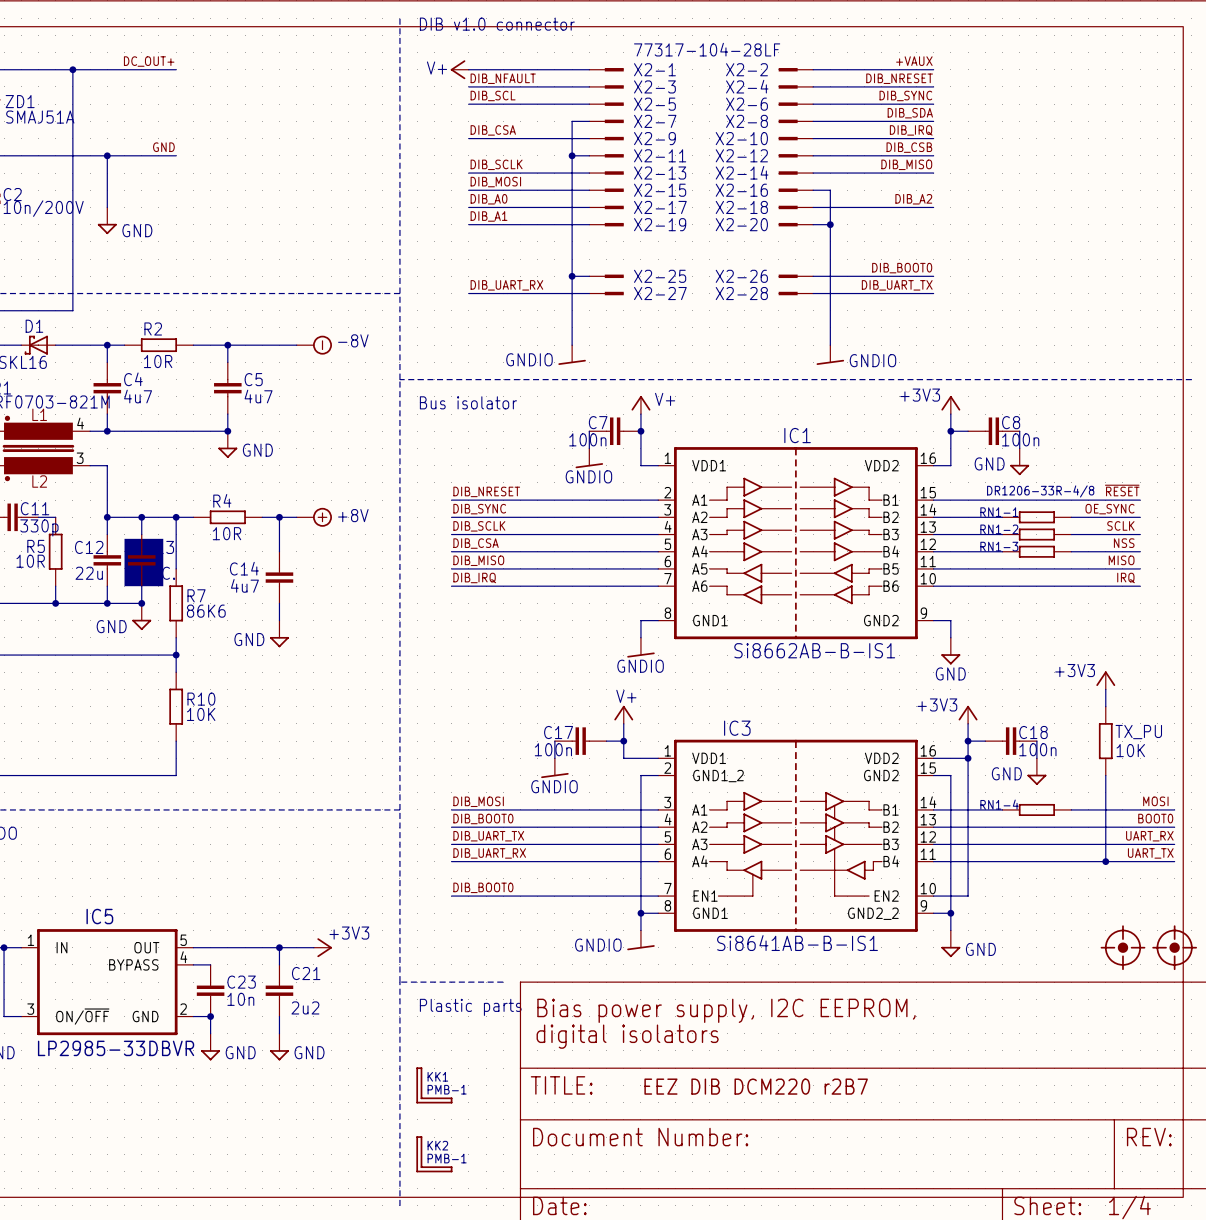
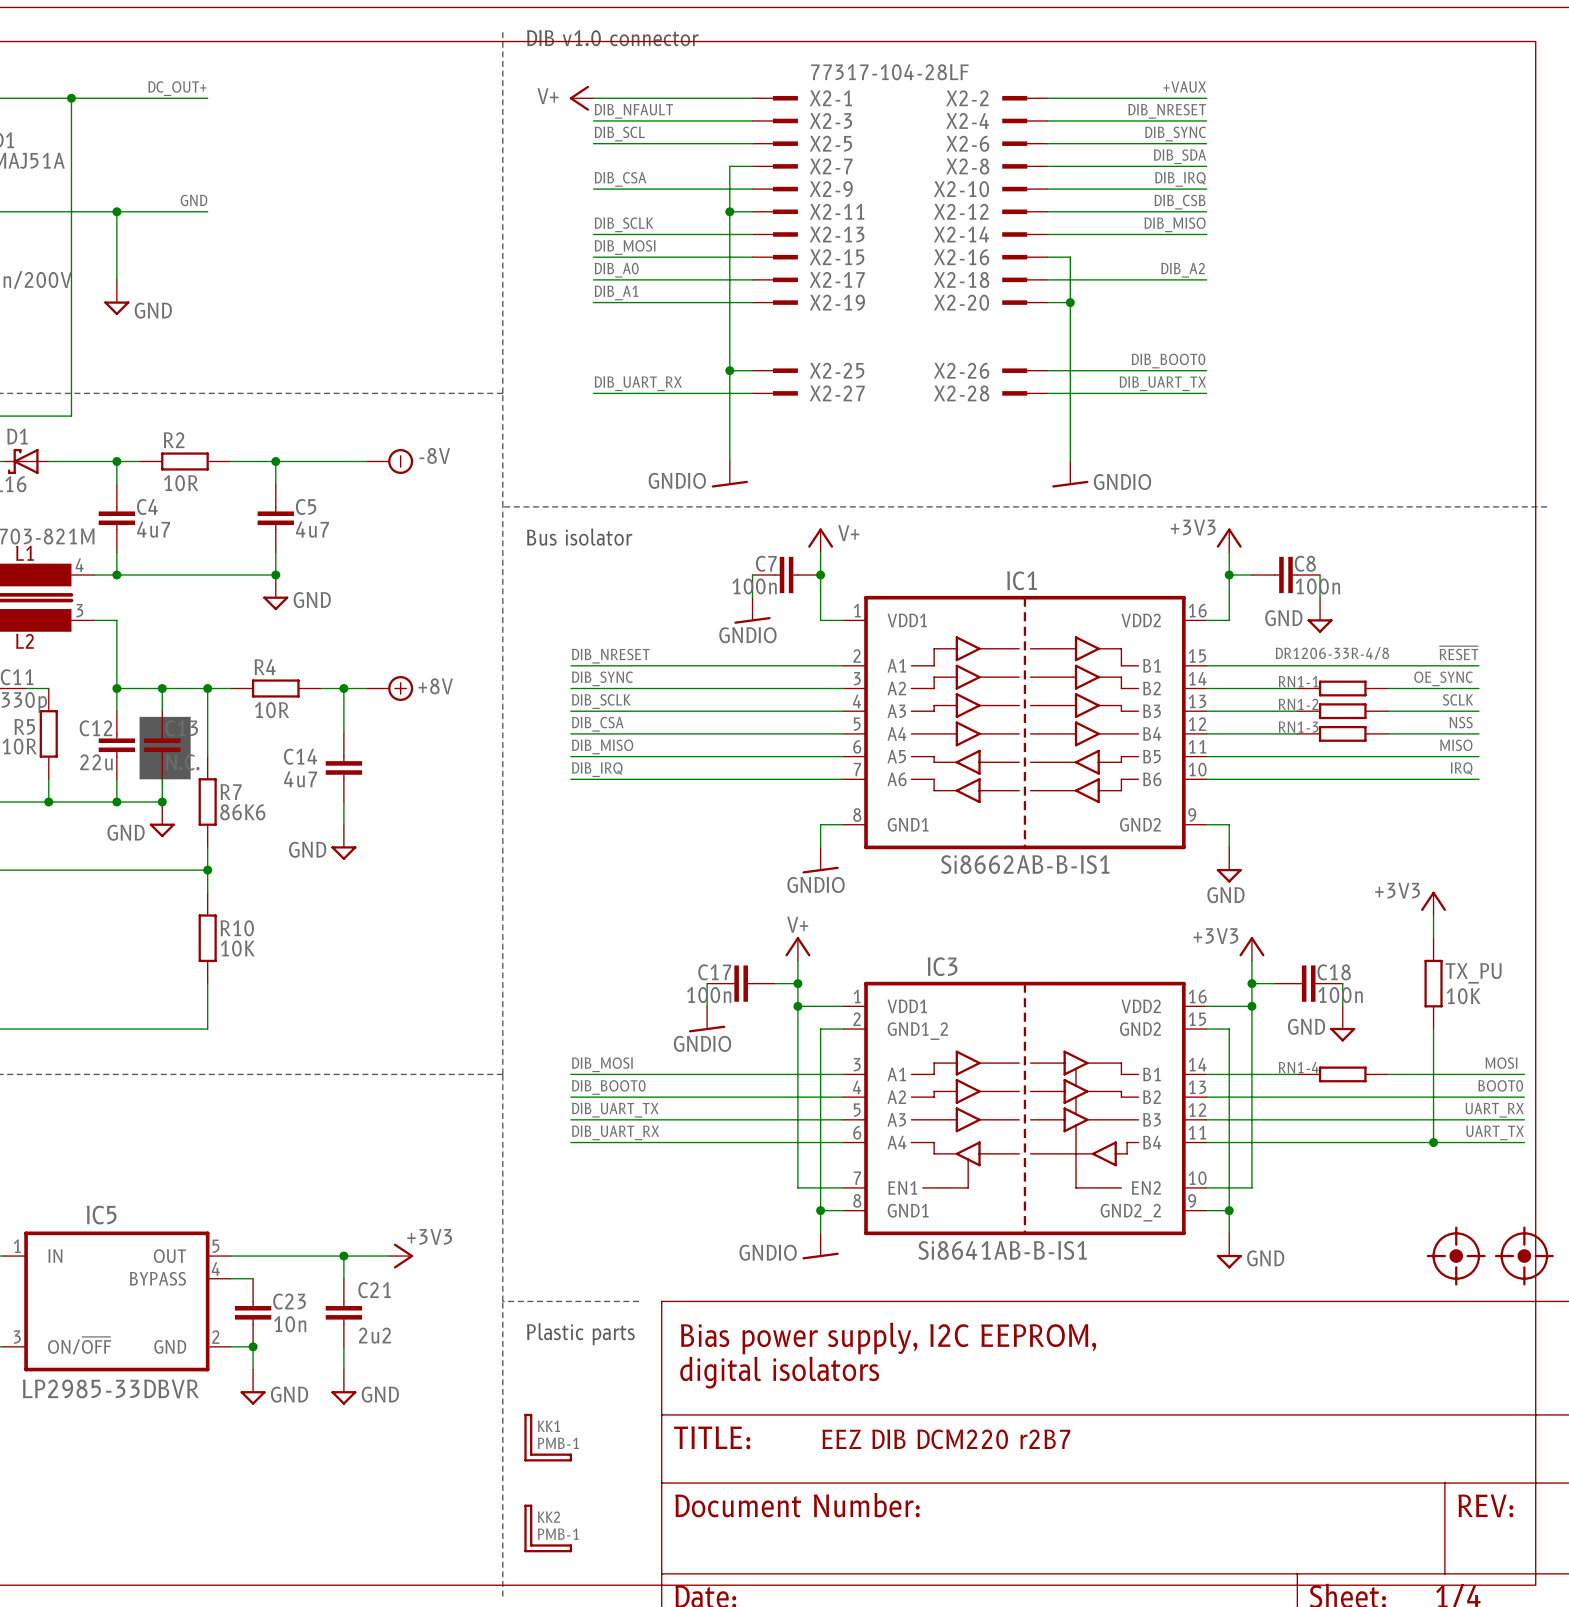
junction: none -> (797, 1006)
label: DIB_BOOT0 (483, 887) -> none
wire: (451, 896) (623, 896) -> (797, 1006) (797, 1187)

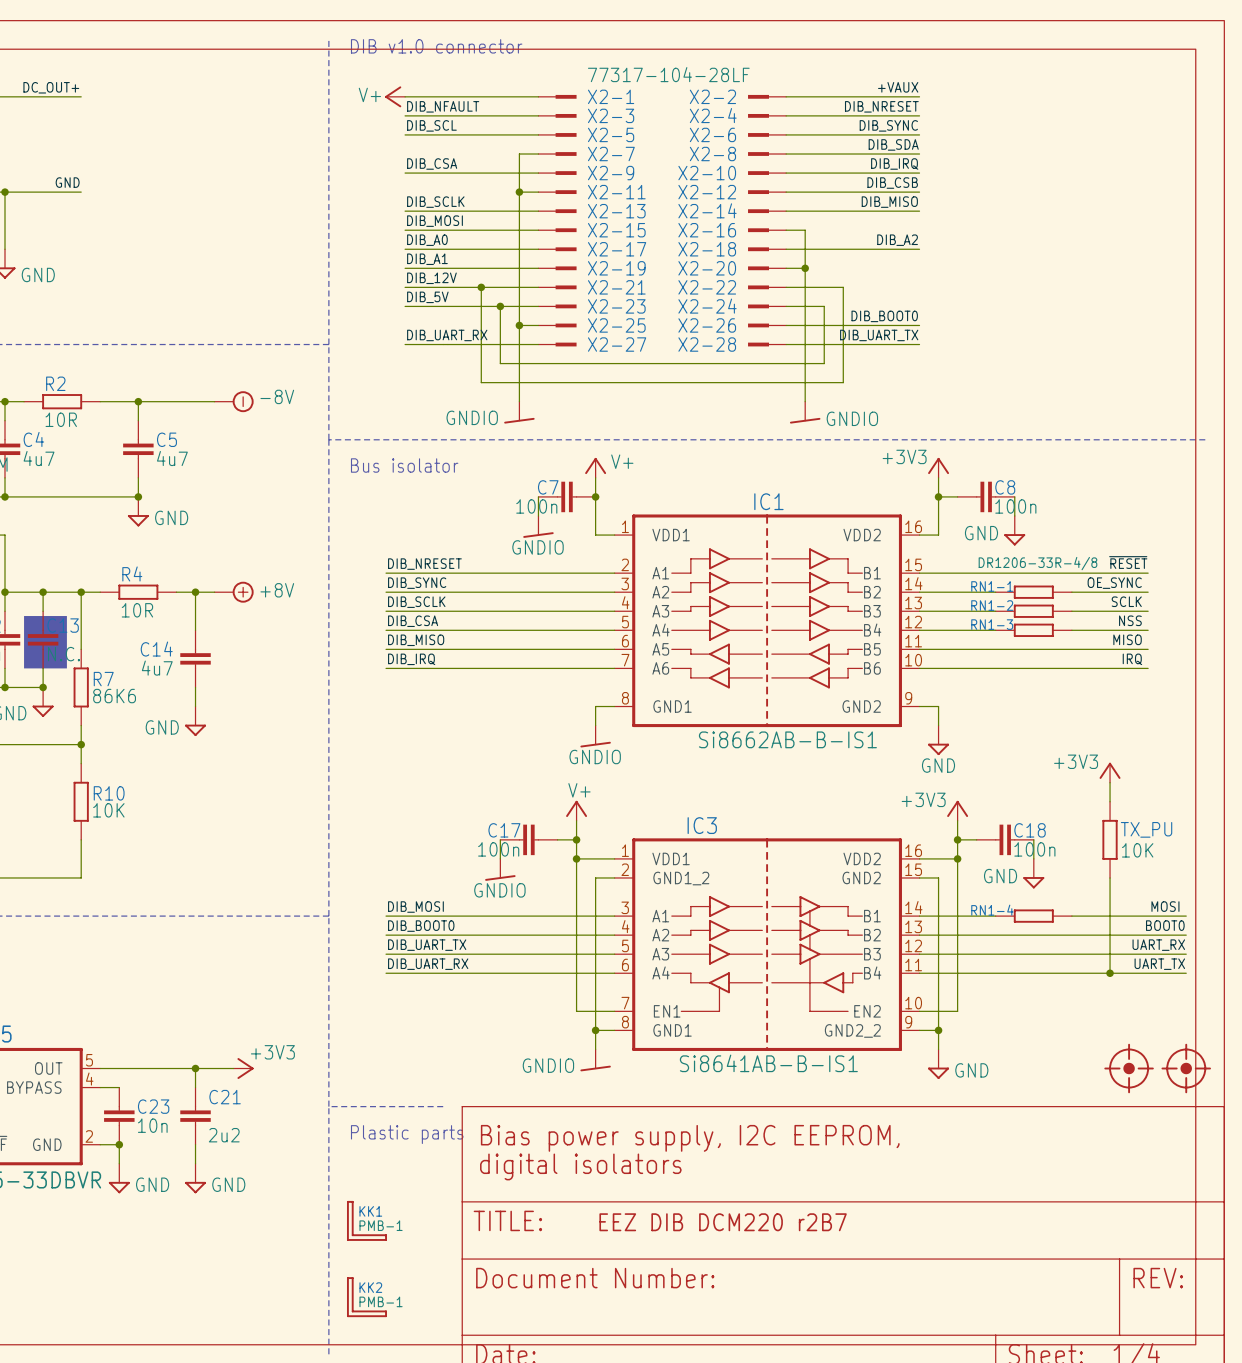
label: none -> DIB_12V (431, 278)
wire: none -> (405, 287) (538, 287)
wire: none -> (481, 287) (481, 382) (843, 382) (843, 287) (786, 287)
junction: none -> (481, 287)
X2-21: none -> (557, 287)
X2-22: none -> (767, 287)
label: none -> DIB_5V (427, 297)
wire: none -> (405, 306) (538, 306)
wire: none -> (500, 306) (500, 363) (824, 363) (824, 306) (786, 306)
junction: none -> (500, 306)
X2-23: none -> (557, 306)
X2-24: none -> (767, 306)

